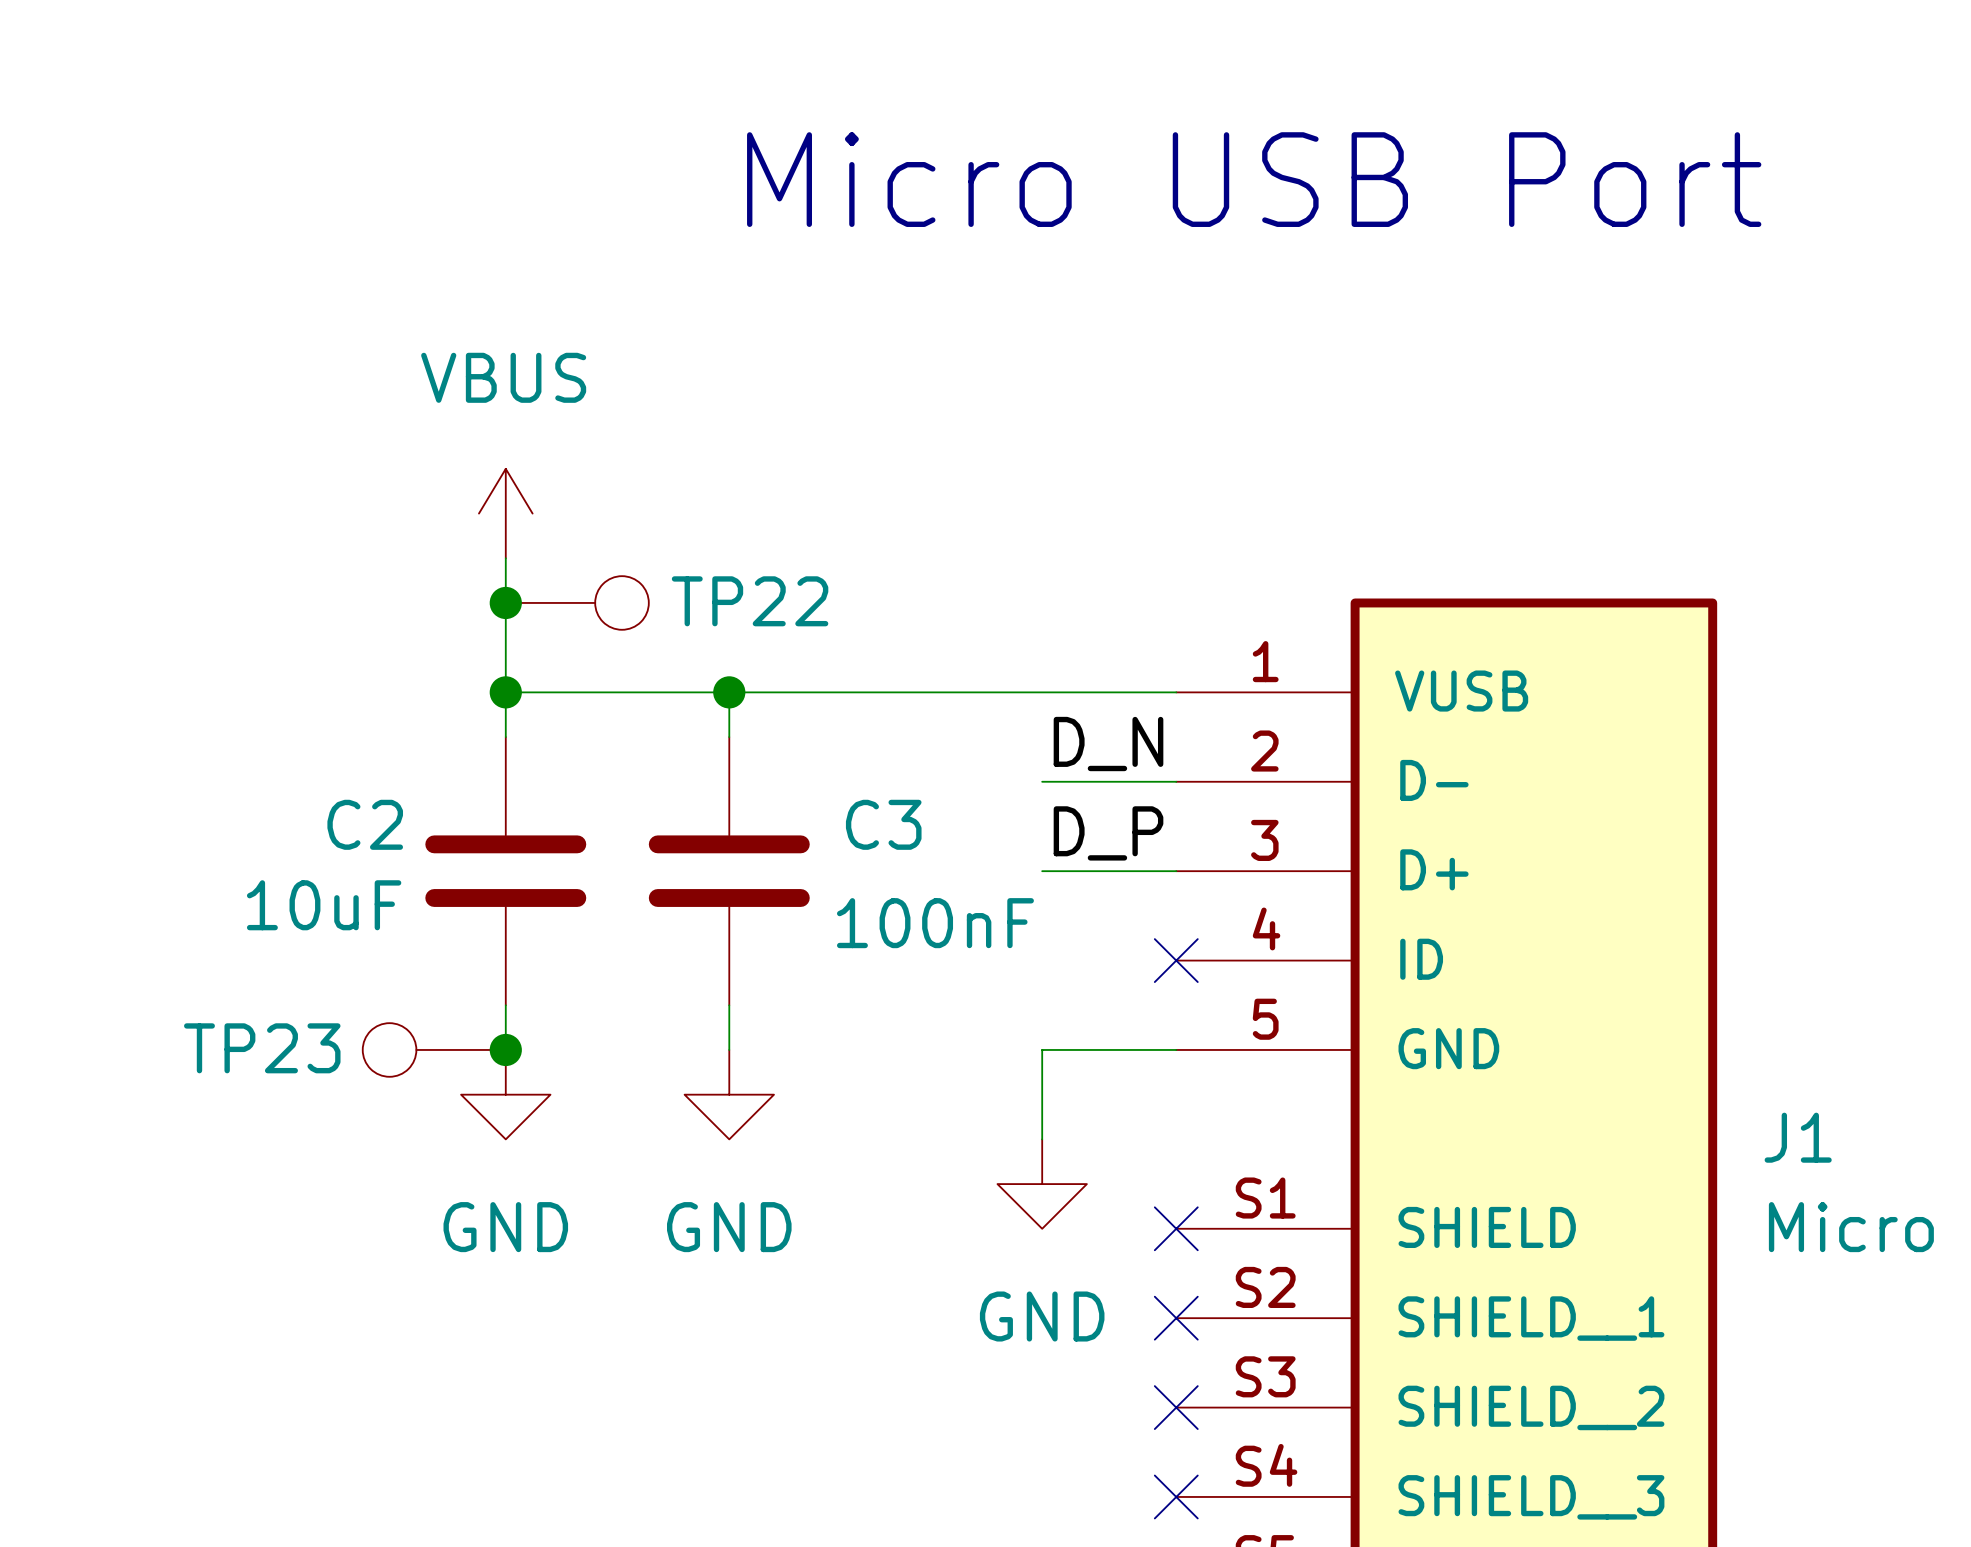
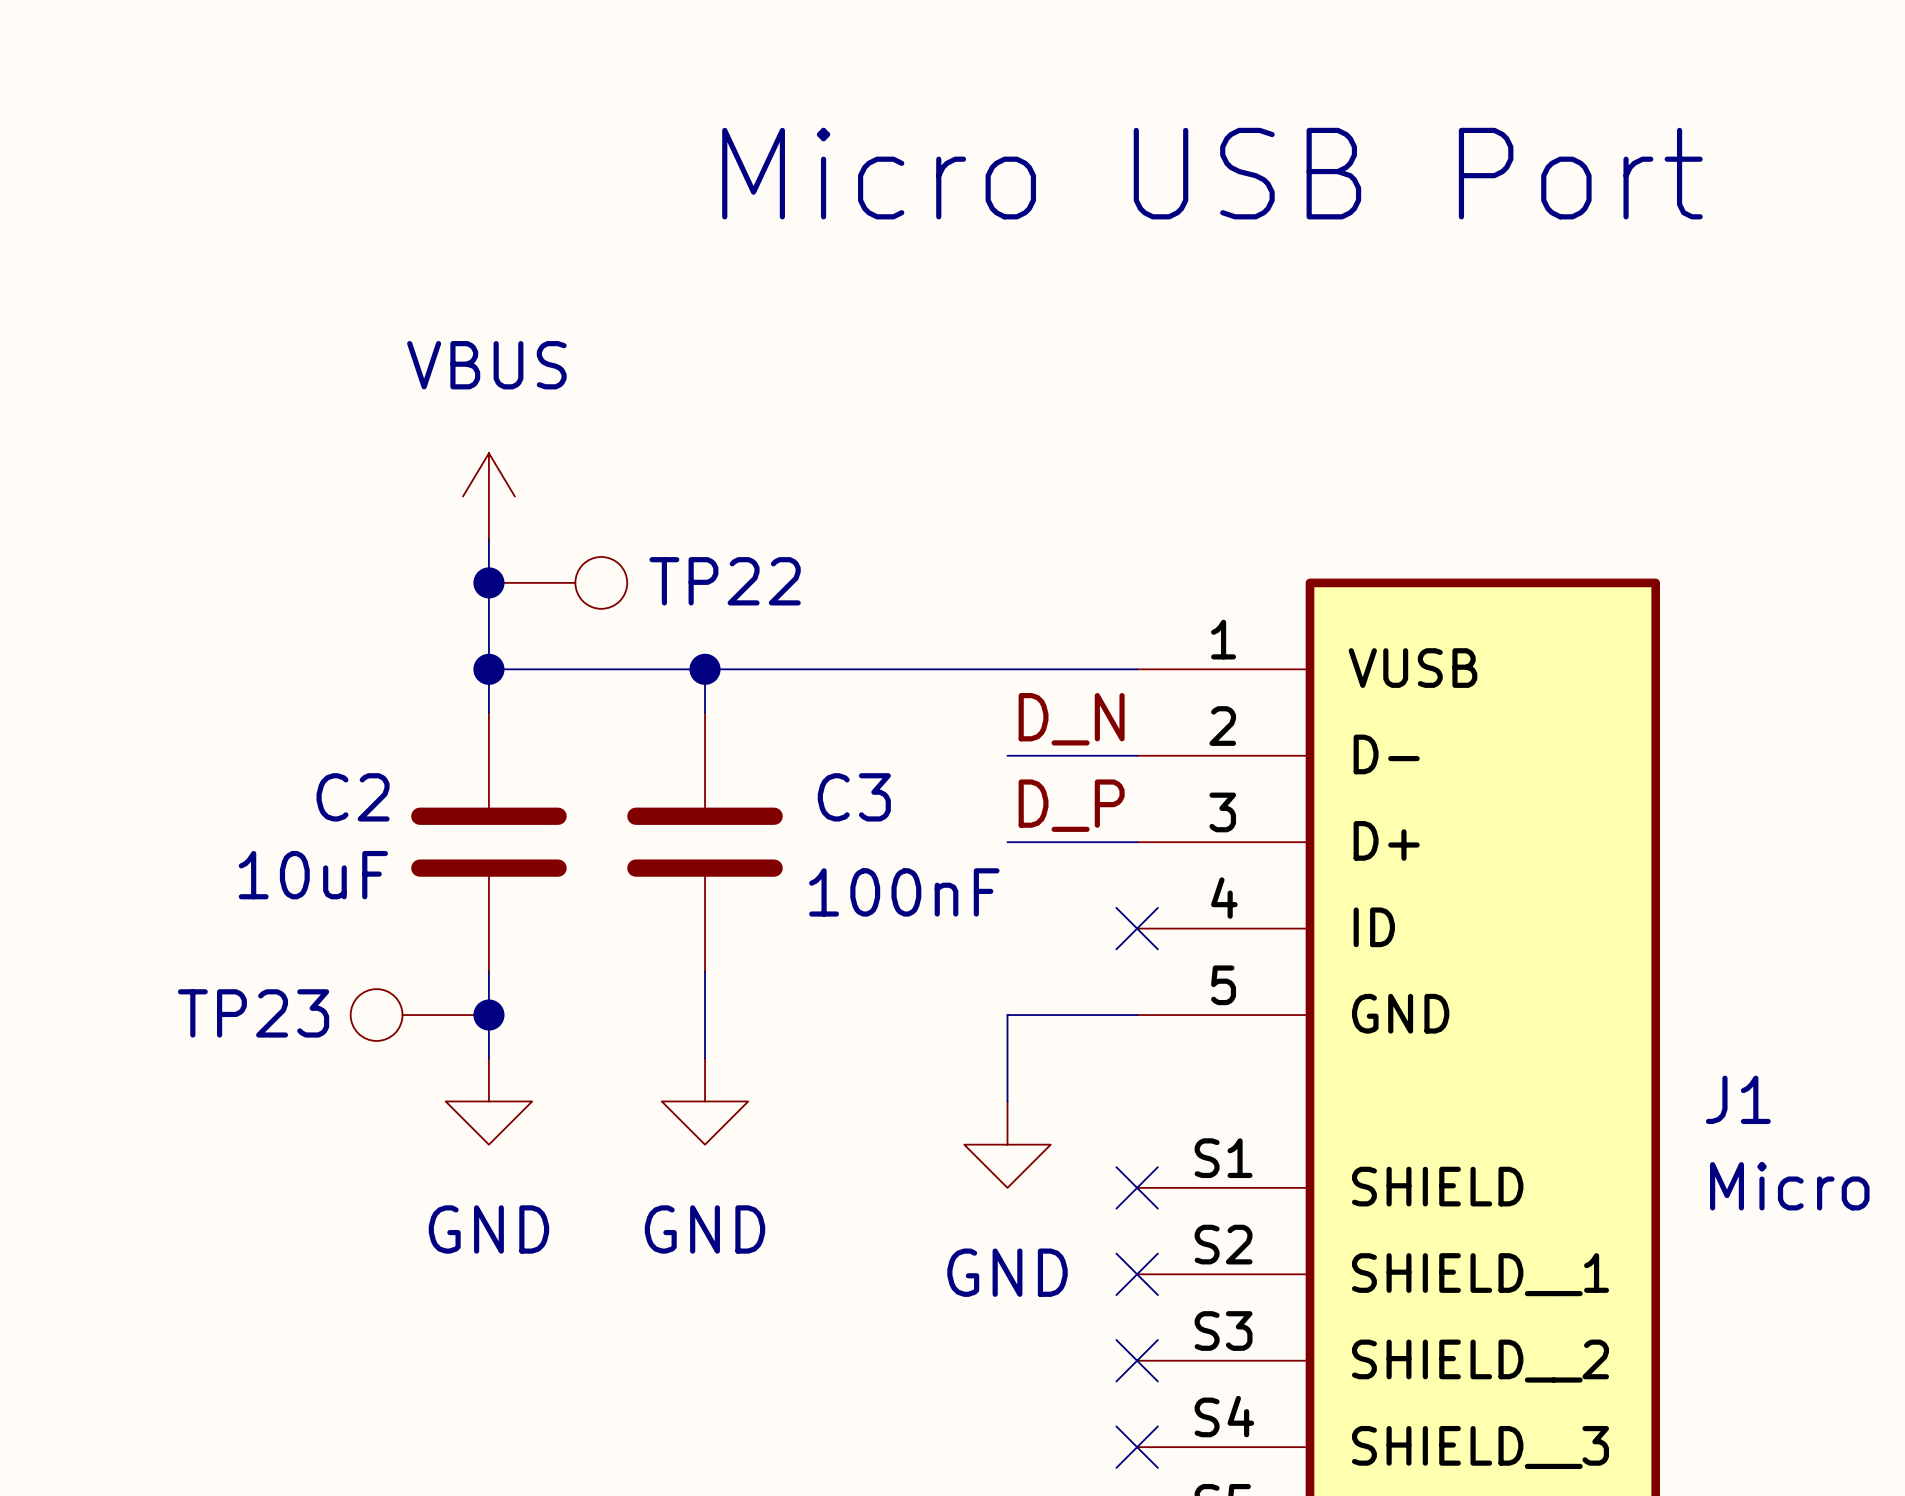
power symbol position: GND (505, 1094) -> GND (488, 1101)
power symbol position: GND (729, 1094) -> GND (705, 1101)

